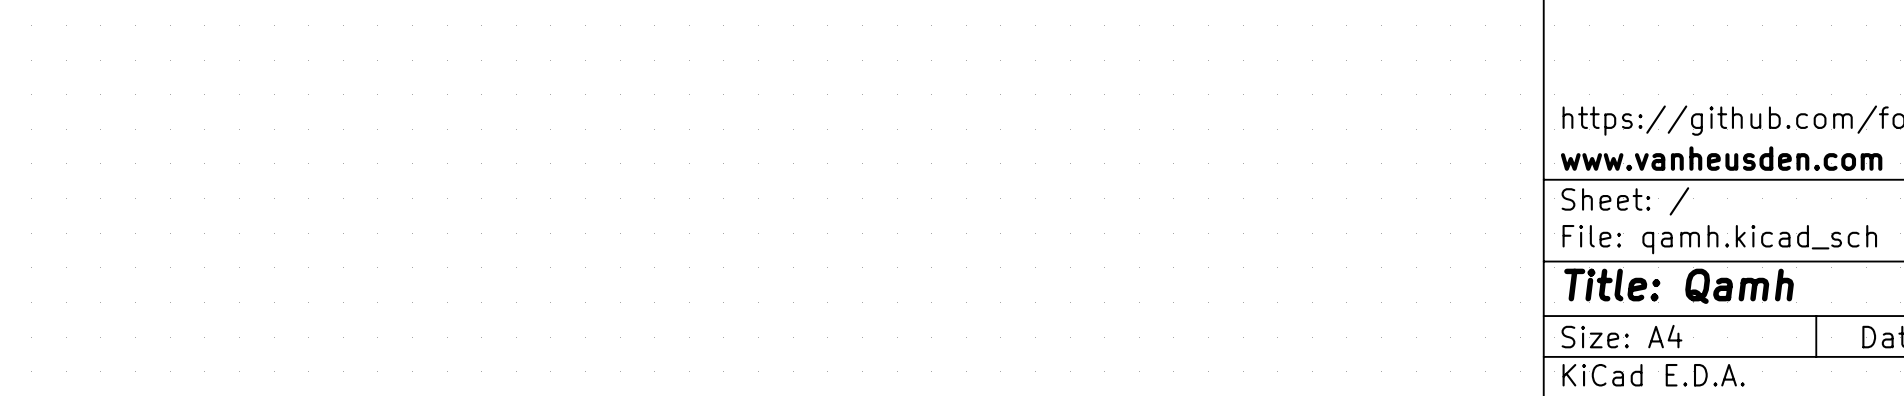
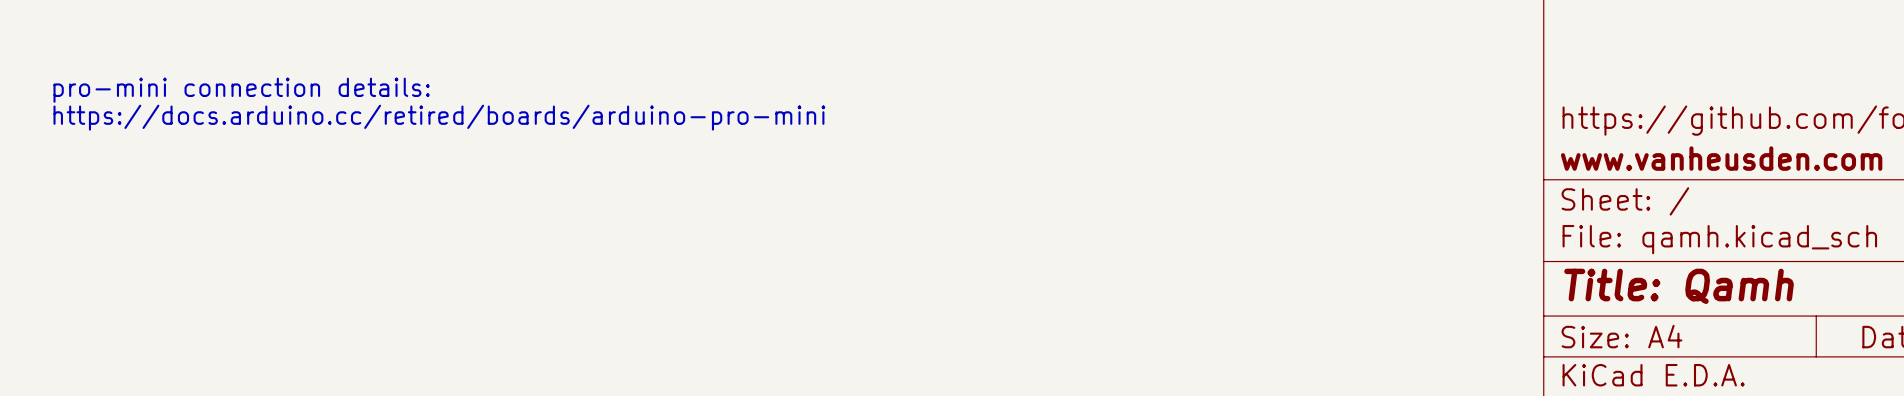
text: none -> pro-mini connection details: (241, 90)
text: none -> https://docs.arduino.cc/retired/boards/arduino-pro-mini (439, 117)

